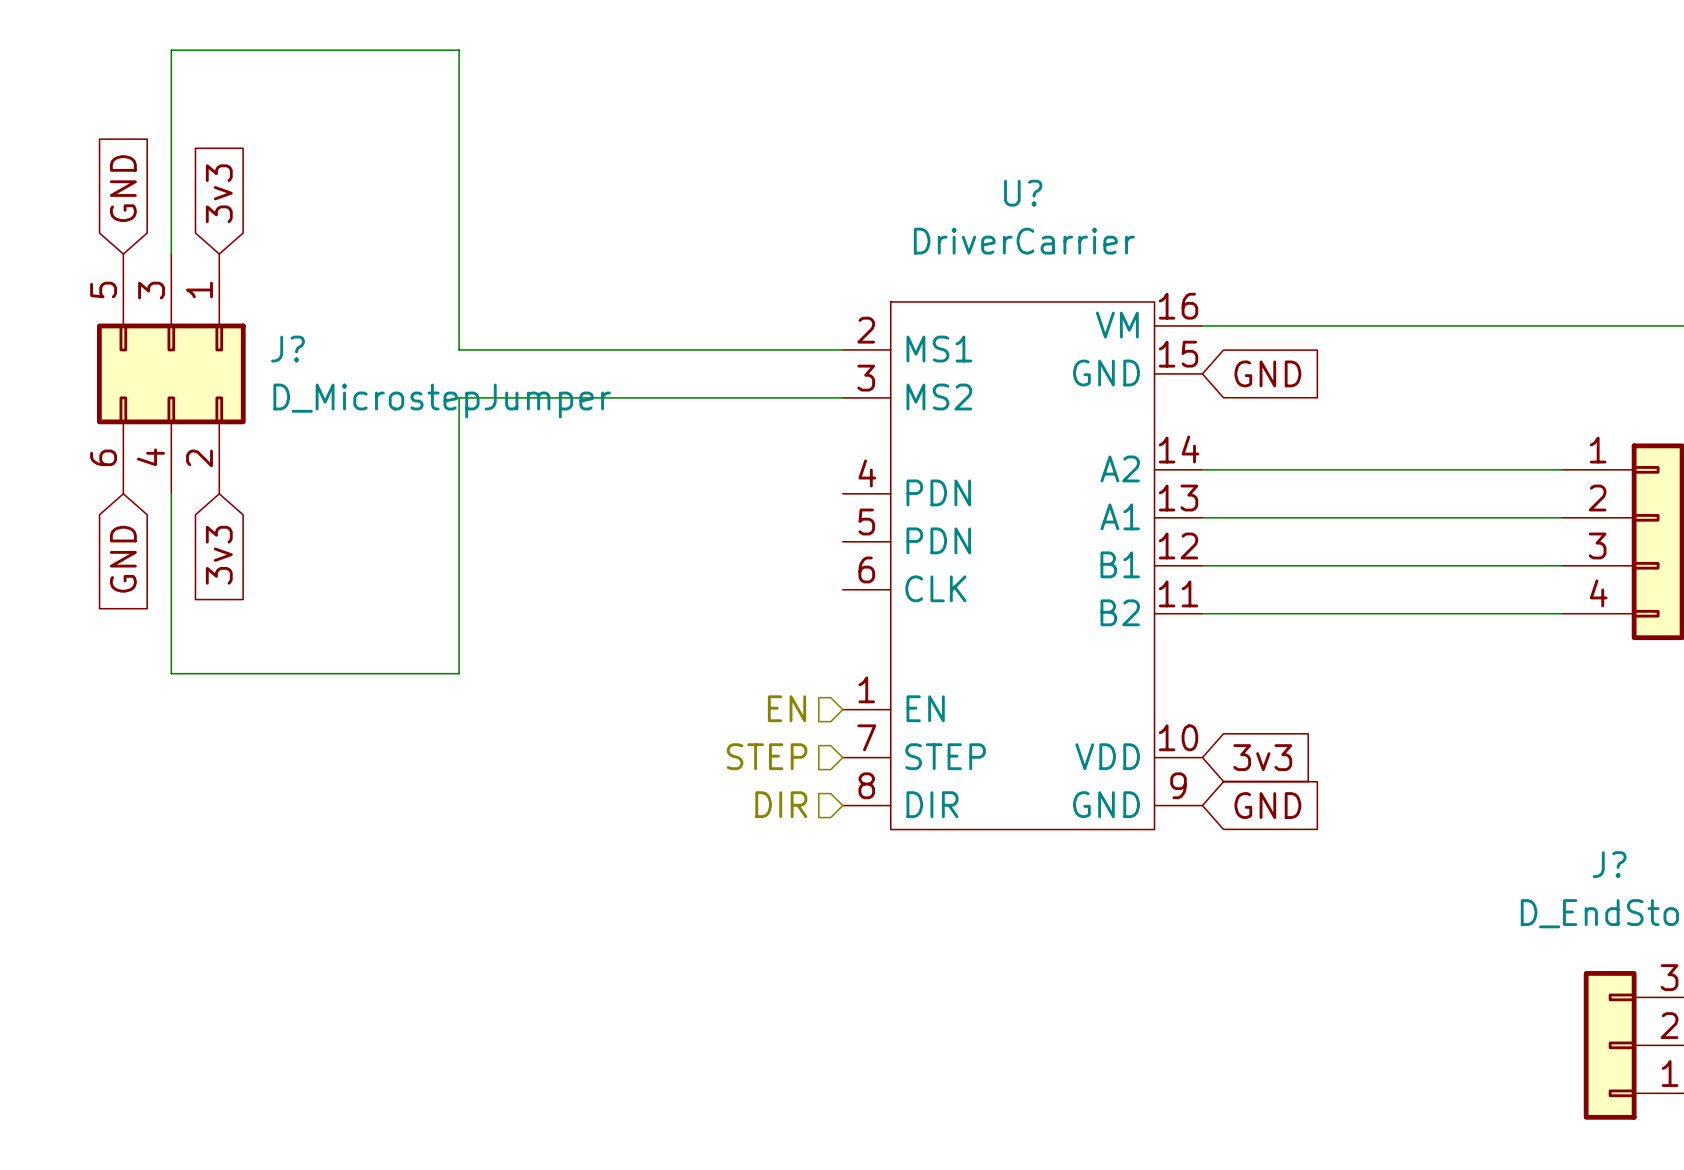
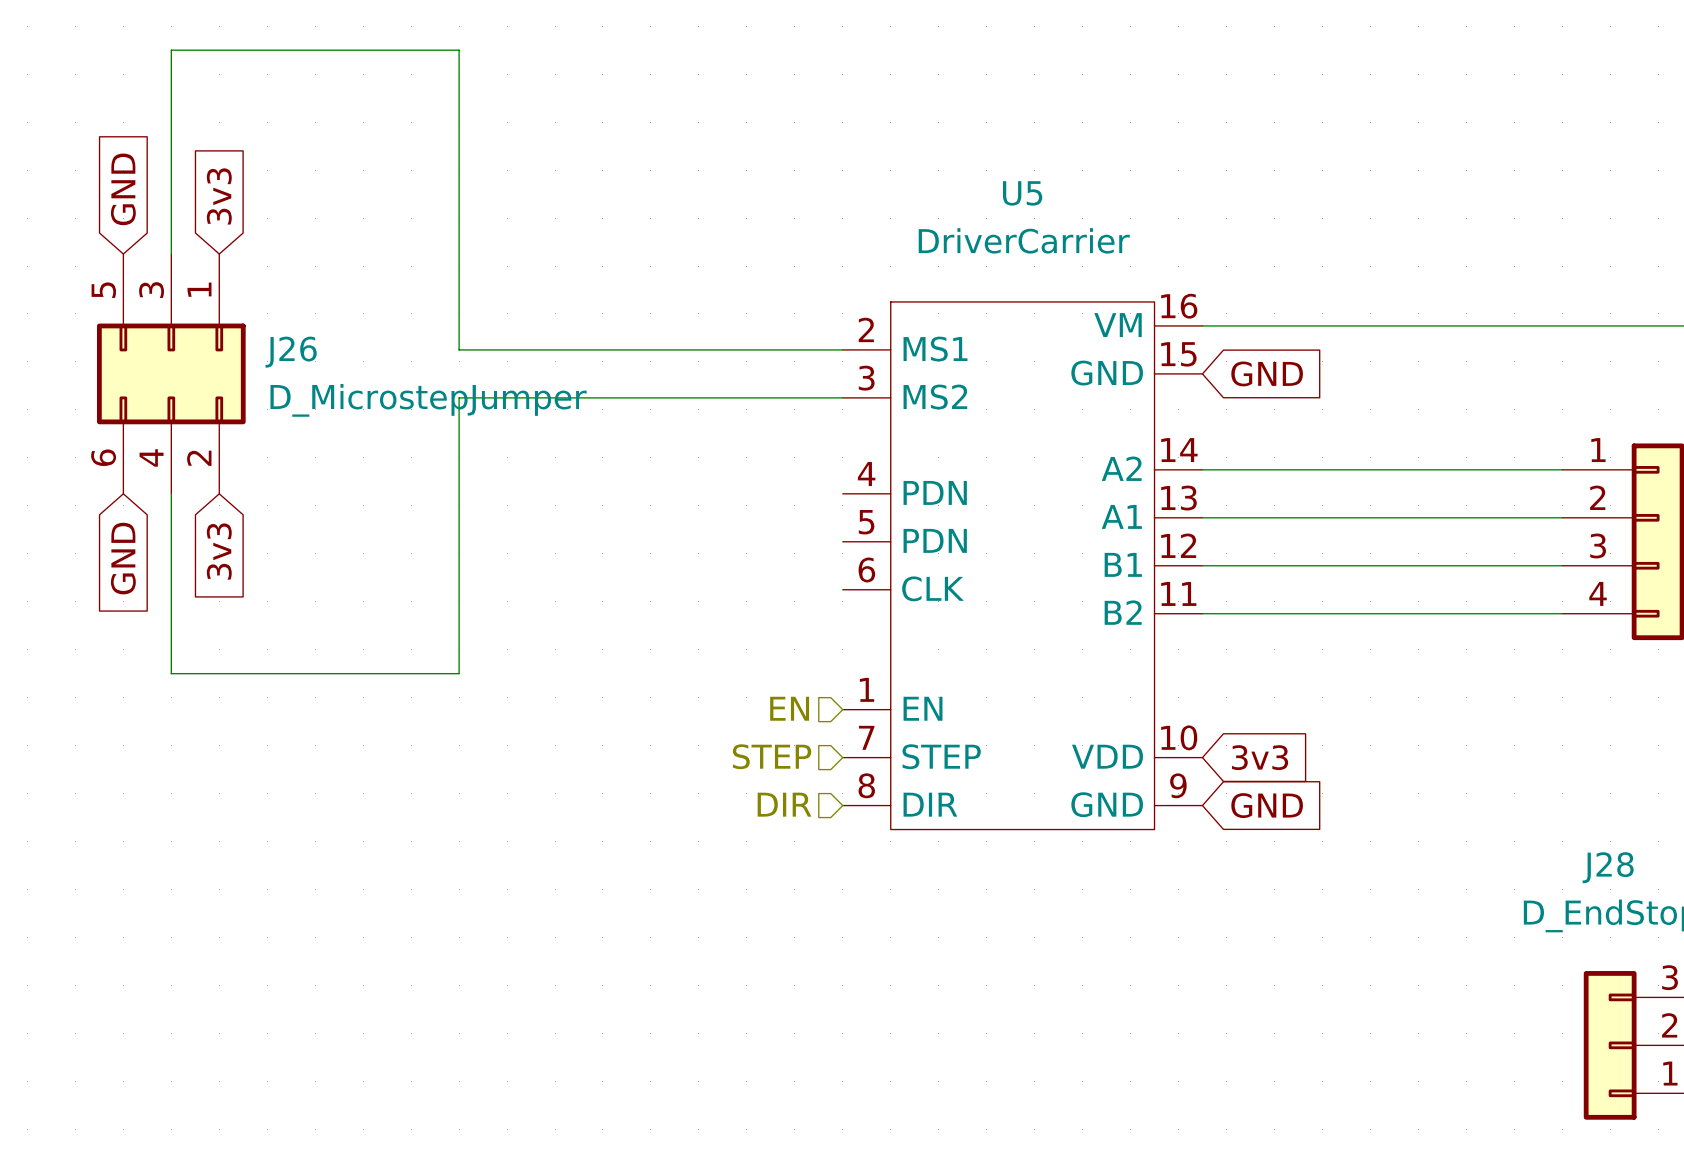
U? name: U? (1023, 193) -> U5 (1022, 193)
J? name: J? (287, 349) -> J26 (291, 352)
J? name: J? (1609, 864) -> J28 (1608, 867)

